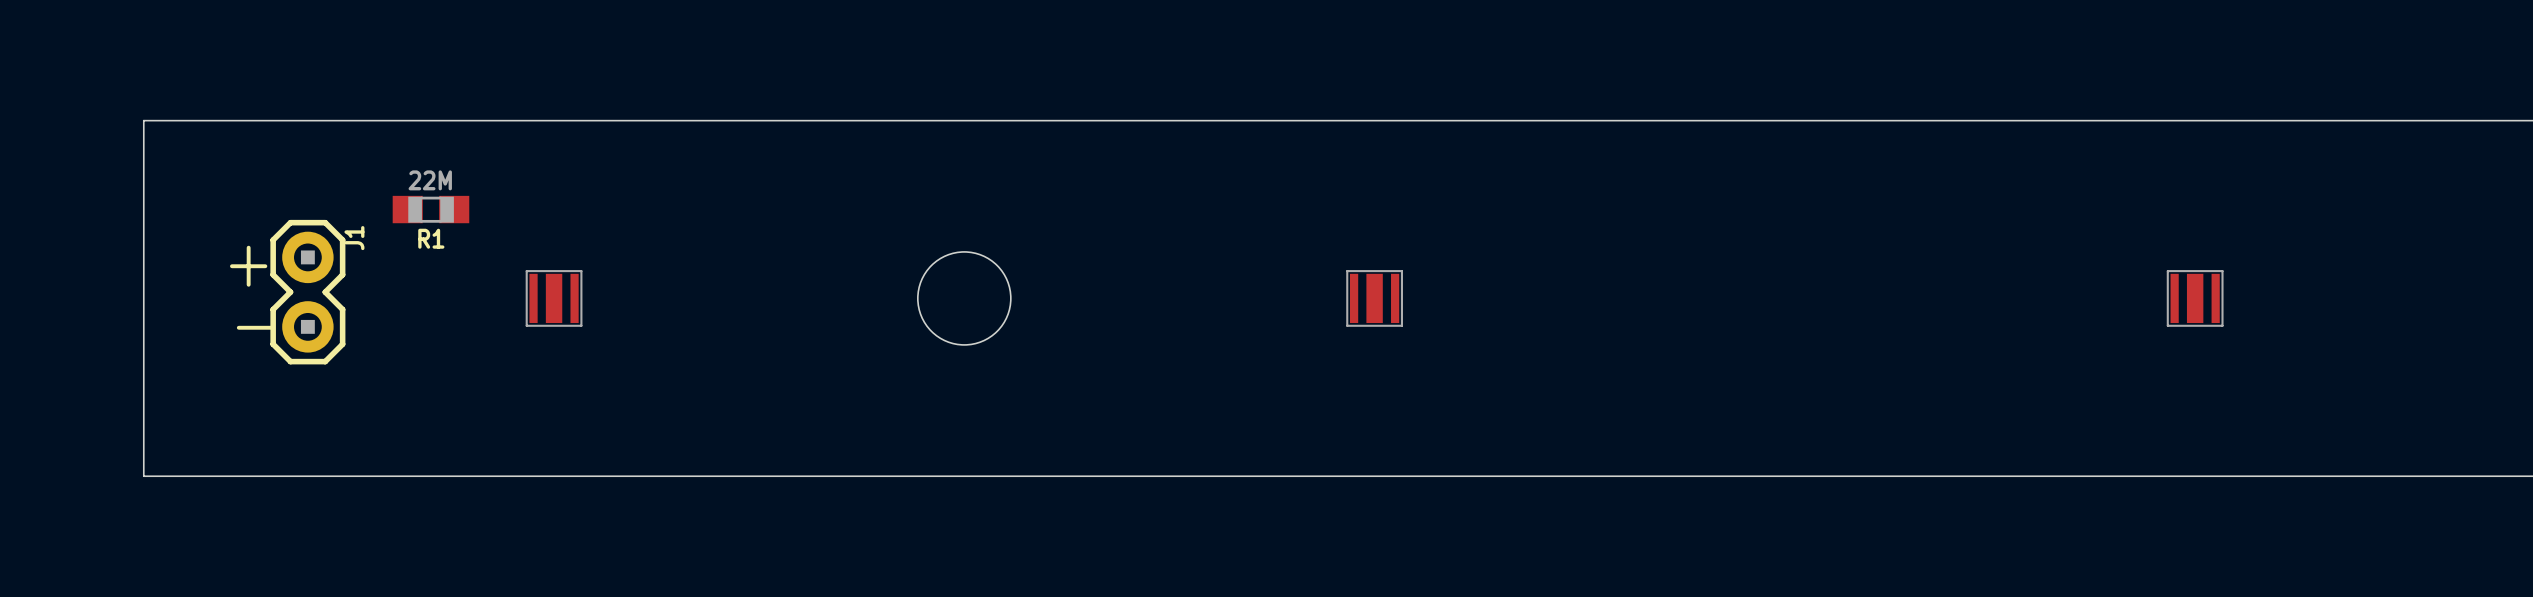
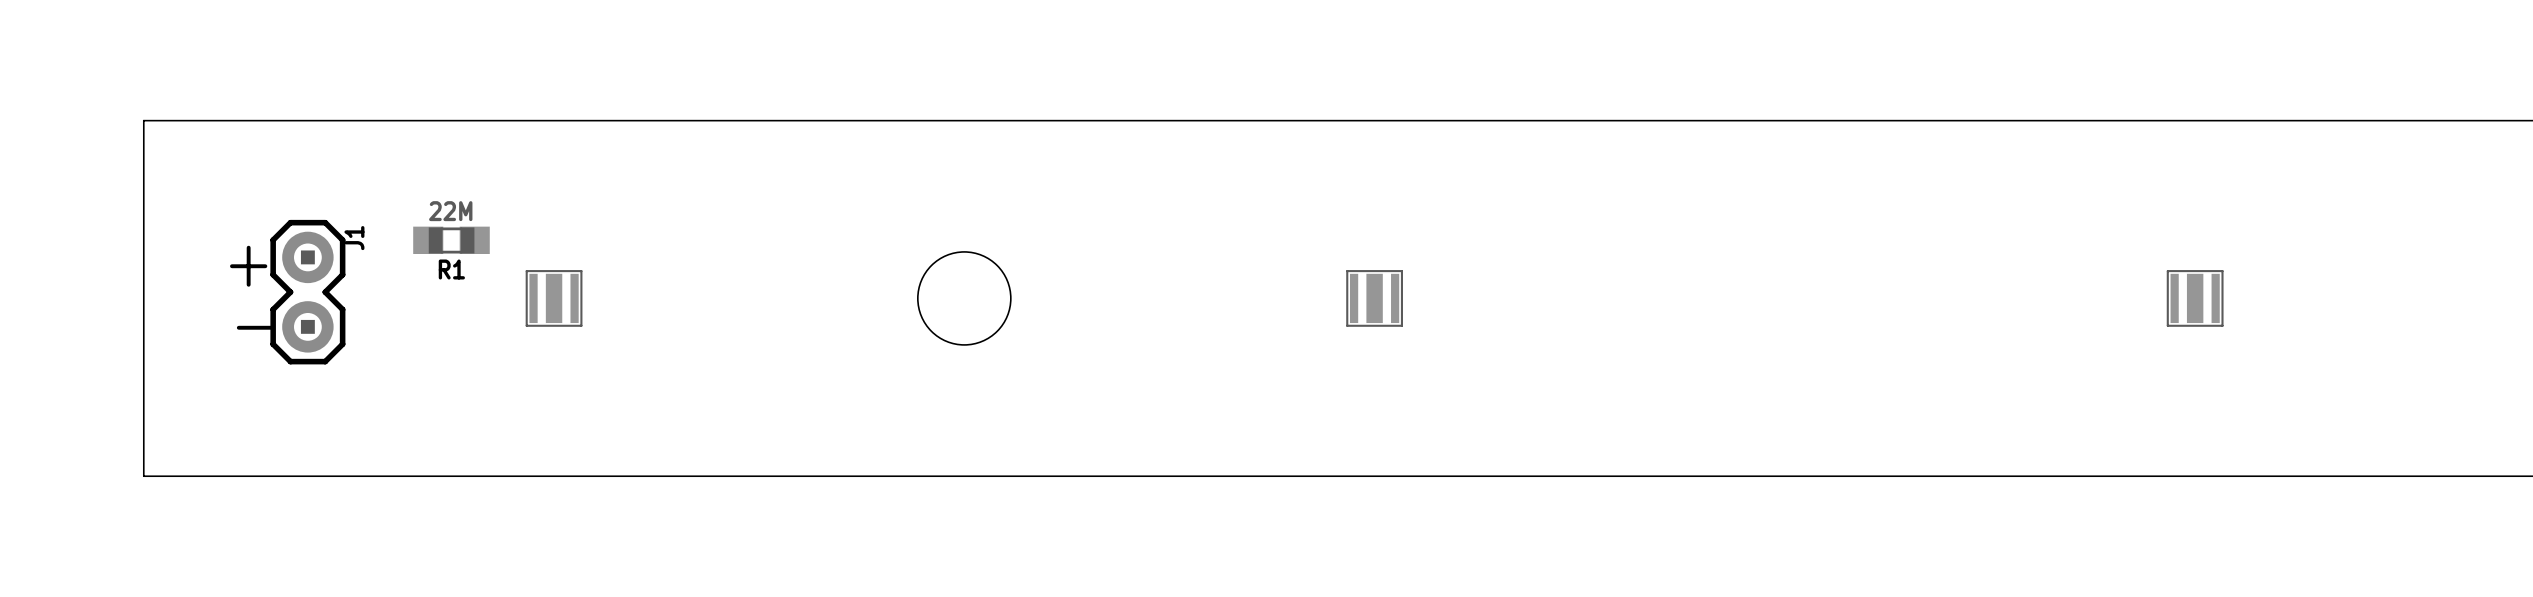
R1 position: (430, 209) -> (451, 240)

